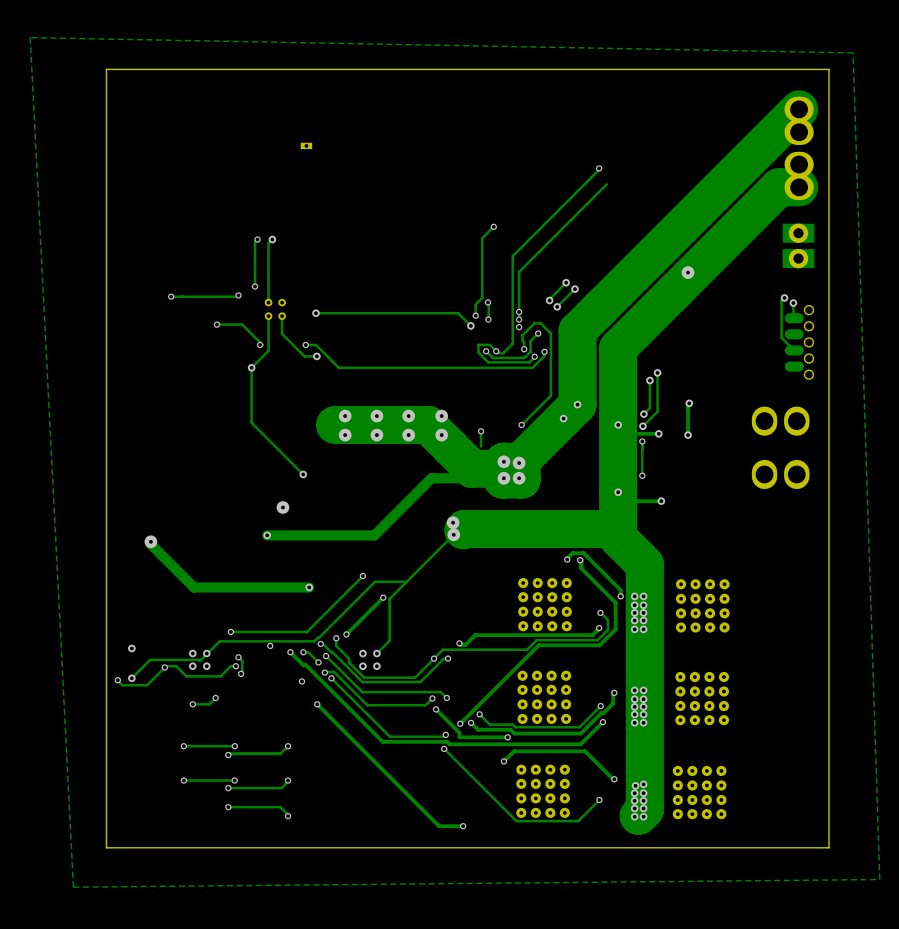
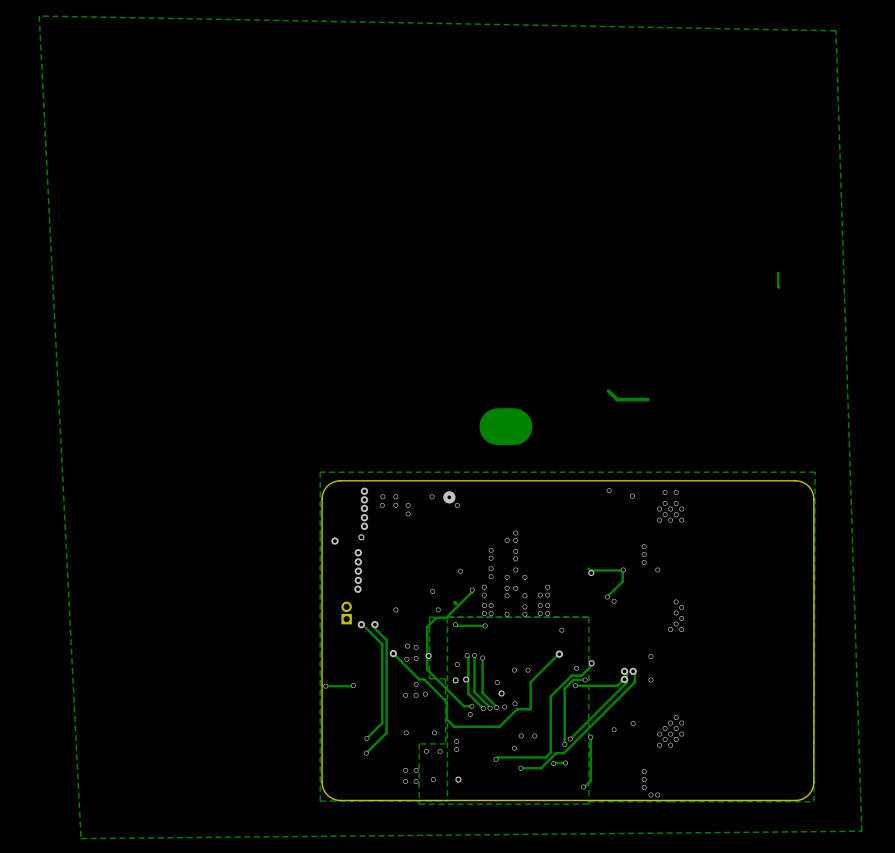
track: (799, 109) (577, 330) (577, 404) (502, 479) (521, 479) (521, 460) -> none
part: (306, 145) -> none
part: (799, 148) -> none
via: (599, 168) -> none
track: (599, 169) (512, 256) (512, 343) (503, 353) (498, 353) (489, 344) (478, 344) (478, 352) (488, 362) (529, 362) (534, 356) -> none
track: (606, 184) (519, 271) (519, 319) -> none
track: (799, 187) (779, 187) (618, 348) (618, 537) -> none
track: (493, 226) (482, 238) (482, 297) (475, 304) (475, 315) -> none
via: (493, 226) -> none
track: (257, 239) (255, 242) (255, 286) -> none
via: (257, 239) -> none
track: (272, 239) (268, 243) (268, 302) -> none
via: (272, 239) -> none
part: (798, 245) -> none
via: (688, 272) -> none
track: (566, 282) (549, 300) -> none
via: (566, 282) -> none
via: (255, 286) -> none
track: (575, 289) (557, 306) -> none
via: (575, 289) -> none
via: (238, 295) -> none
via: (171, 296) -> none
track: (238, 296) (171, 296) -> none
track: (784, 297) (781, 300) (781, 337) (794, 350) -> none
via: (784, 297) -> none
via: (549, 300) -> none
track: (488, 302) (488, 319) -> none
via: (488, 302) -> none
via: (793, 303) -> none
via: (557, 306) -> none
part: (275, 309) -> none
via: (519, 311) -> none
track: (315, 313) (458, 313) (470, 325) -> none
via: (315, 313) -> none
via: (475, 315) -> none
track: (268, 316) (268, 350) (251, 367) (251, 422) (303, 474) -> none
track: (282, 316) (282, 333) (304, 356) (316, 356) -> none
via: (488, 319) -> none
via: (519, 319) -> none
track: (216, 324) (242, 324) (260, 342) (260, 344) (262, 344) -> none
via: (216, 324) -> none
via: (470, 325) -> none
via: (519, 327) -> none
track: (538, 333) (530, 341) (530, 351) (524, 357) (492, 357) (486, 351) -> none
via: (538, 333) -> none
part: (799, 342) -> none
via: (260, 344) -> none
track: (305, 344) (315, 344) (338, 367) (532, 367) (544, 356) (544, 351) -> none
via: (305, 344) -> none
track: (524, 349) (522, 335) (534, 323) (540, 323) (550, 333) (550, 395) (521, 424) -> none
via: (524, 349) -> none
via: (486, 351) -> none
via: (496, 351) -> none
via: (544, 351) -> none
via: (316, 356) -> none
via: (534, 356) -> none
via: (251, 367) -> none
track: (657, 372) (657, 411) (642, 426) -> none
via: (657, 372) -> none
track: (649, 380) (649, 408) (643, 414) -> none
via: (649, 380) -> none
track: (689, 403) (688, 435) -> none
via: (689, 403) -> none
via: (577, 404) -> none
via: (643, 414) -> none
via: (345, 416) -> none
via: (376, 416) -> none
via: (408, 416) -> none
via: (441, 416) -> none
via: (563, 418) -> none
part: (780, 421) -> none
track: (335, 424) (428, 424) (471, 468) (496, 468) (503, 461) (503, 478) (431, 478) (374, 535) (267, 535) -> none
via: (521, 424) -> none
via: (618, 424) -> none
via: (642, 426) -> none
track: (481, 431) (481, 446) -> none
via: (481, 431) -> none
via: (658, 433) -> none
via: (345, 435) -> none
via: (376, 435) -> none
via: (408, 435) -> none
via: (441, 435) -> none
via: (688, 435) -> none
track: (642, 440) (642, 475) -> none
via: (642, 441) -> none
via: (503, 461) -> none
via: (519, 463) -> none
via: (303, 474) -> none
part: (780, 474) -> none
via: (642, 475) -> none
via: (503, 478) -> none
via: (519, 478) -> none
track: (618, 492) (627, 501) (661, 501) -> none
via: (618, 492) -> none
via: (661, 501) -> none
via: (282, 507) -> none
via: (453, 522) -> none
via: none -> (609, 490)
via: none -> (364, 491)
via: none -> (665, 492)
via: none -> (676, 492)
track: (463, 530) (609, 529) (644, 564) (644, 809) (638, 816) -> none
via: none -> (632, 496)
via: none -> (382, 496)
via: none -> (395, 496)
via: none -> (432, 496)
track: (453, 534) (389, 598) (389, 640) (376, 653) -> none
via: (267, 535) -> none
via: none -> (364, 499)
track: (150, 541) (150, 544) (194, 587) (309, 587) -> none
via: (150, 541) -> none
via: none -> (665, 503)
via: none -> (676, 503)
via: none -> (382, 505)
via: none -> (395, 505)
via: none -> (408, 505)
via: none -> (457, 505)
via: none -> (364, 508)
via: none -> (659, 509)
via: none -> (670, 509)
via: none -> (681, 509)
via: none -> (408, 514)
via: none -> (665, 514)
via: none -> (676, 514)
via: none -> (364, 517)
via: none -> (659, 520)
via: none -> (670, 520)
via: none -> (681, 520)
track: (567, 559) (572, 553) (583, 553) (620, 590) (620, 596) -> none
via: (567, 559) -> none
track: (581, 559) (581, 568) (615, 602) (615, 629) (599, 645) (538, 645) (460, 723) -> none
via: (580, 560) -> none
via: none -> (364, 526)
via: none -> (515, 533)
track: (362, 576) (307, 631) (230, 631) -> none
via: none -> (334, 541)
via: none -> (507, 540)
via: none -> (515, 540)
track: (406, 581) (375, 581) (314, 641) (219, 641) (199, 661) (150, 659) (131, 678) -> none
via: none -> (644, 546)
via: (309, 587) -> none
via: none -> (491, 550)
via: none -> (515, 551)
via: none -> (358, 552)
via: none -> (644, 554)
via: (620, 596) -> none
via: (634, 596) -> none
via: (643, 596) -> none
track: (383, 597) (346, 634) -> none
via: (383, 597) -> none
via: none -> (491, 558)
via: none -> (515, 558)
via: none -> (358, 561)
via: none -> (644, 562)
part: (544, 604) -> none
via: (634, 605) -> none
via: (643, 605) -> none
part: (702, 605) -> none
via: none -> (491, 568)
track: none -> (588, 568) (590, 570) (622, 570)
via: none -> (515, 569)
via: none -> (623, 569)
via: none -> (657, 569)
via: none -> (358, 571)
via: none -> (460, 571)
track: none -> (622, 570) (622, 581) (607, 596)
via: (634, 612) -> none
via: (643, 612) -> none
track: (601, 613) (608, 620) (608, 629) (597, 640) (536, 640) (527, 649) (442, 649) (434, 658) -> none
via: none -> (491, 576)
via: none -> (507, 577)
via: none -> (524, 577)
via: none -> (358, 580)
via: (634, 620) -> none
via: (643, 620) -> none
via: none -> (484, 587)
via: none -> (547, 587)
track: (599, 627) (592, 635) (475, 635) (465, 644) (459, 644) -> none
via: none -> (507, 588)
via: none -> (515, 588)
via: (599, 628) -> none
via: none -> (357, 589)
via: (634, 629) -> none
via: (643, 629) -> none
track: none -> (472, 590) (446, 617) (436, 617) (427, 627) (427, 669) (463, 706) (471, 706)
via: none -> (472, 590)
via: (230, 631) -> none
via: none -> (432, 591)
via: (346, 634) -> none
via: none -> (484, 595)
via: none -> (540, 595)
via: none -> (547, 595)
via: none -> (507, 595)
via: none -> (524, 595)
via: none -> (607, 596)
track: (336, 638) (336, 645) (364, 677) (415, 677) (434, 658) -> none
via: (336, 638) -> none
via: none -> (614, 601)
via: none -> (676, 601)
track: (320, 643) (332, 652) (362, 682) (420, 682) (443, 659) (448, 659) -> none
via: (320, 643) -> none
via: (459, 643) -> none
via: (270, 645) -> none
via: none -> (484, 605)
via: none -> (491, 605)
via: none -> (540, 605)
via: none -> (547, 605)
via: none -> (524, 606)
via: (131, 648) -> none
via: none -> (681, 607)
via: none -> (395, 609)
via: none -> (438, 609)
track: (290, 652) (303, 664) (305, 664) (382, 741) (447, 741) (449, 744) (580, 744) (602, 722) -> none
via: (290, 652) -> none
track: (303, 652) (308, 652) (318, 662) -> none
via: (303, 652) -> none
via: (192, 653) -> none
via: (206, 653) -> none
via: (362, 653) -> none
via: (376, 653) -> none
part: none -> (346, 612)
via: none -> (484, 613)
via: none -> (491, 613)
via: none -> (540, 613)
via: none -> (547, 613)
via: none -> (676, 612)
via: none -> (507, 614)
via: none -> (524, 614)
track: (326, 656) (362, 692) (440, 692) (446, 698) -> none
via: (326, 656) -> none
track: (238, 657) (242, 661) (241, 673) -> none
via: (238, 657) -> none
via: (434, 658) -> none
via: (448, 658) -> none
zone outline: none -> (447, 617) (447, 801) (320, 801) (320, 472) (815, 472) (813, 801) (588, 801)
zone outline: none -> (588, 617) (429, 617) (429, 678) (445, 678) (445, 743) (419, 743) (419, 804) (588, 804) (588, 617)
via: none -> (681, 618)
via: (318, 662) -> none
via: none -> (676, 624)
via: (192, 666) -> none
via: (206, 666) -> none
track: (235, 666) (230, 666) (220, 676) (186, 676) (176, 666) (166, 666) (147, 685) (122, 685) (117, 680) -> none
via: (235, 666) -> none
track: none -> (455, 624) (485, 625)
via: none -> (455, 624)
via: (164, 667) -> none
via: none -> (485, 625)
track: none -> (365, 627) (382, 644) (382, 723) (366, 738)
track: none -> (375, 628) (386, 640) (386, 732) (366, 753)
via: none -> (561, 630)
via: none -> (670, 629)
via: none -> (681, 629)
track: (324, 672) (334, 671) (367, 705) (425, 705) (432, 698) -> none
via: (324, 672) -> none
via: (241, 673) -> none
via: (131, 678) -> none
track: (331, 678) (389, 736) (443, 736) (445, 734) -> none
via: (331, 678) -> none
via: (117, 680) -> none
via: (301, 681) -> none
via: none -> (407, 646)
via: none -> (416, 647)
via: (634, 690) -> none
via: (643, 690) -> none
track: (613, 692) (613, 703) (580, 733) (514, 733) (510, 729) (477, 729) (471, 722) -> none
via: (614, 692) -> none
track: none -> (393, 653) (419, 679) (424, 679) (446, 702) (446, 719) (454, 726) (499, 726) (517, 709) (530, 709) (530, 682) (559, 654)
via: none -> (393, 653)
via: none -> (559, 654)
track: (215, 697) (209, 704) (192, 704) -> none
via: (215, 697) -> none
via: (446, 697) -> none
track: none -> (467, 655) (468, 693) (483, 708)
via: none -> (467, 655)
track: none -> (474, 655) (474, 692) (490, 708)
via: none -> (474, 655)
part: (544, 697) -> none
part: (702, 698) -> none
via: (634, 699) -> none
via: (643, 699) -> none
via: none -> (650, 656)
track: none -> (482, 657) (482, 693) (496, 707)
via: none -> (482, 657)
via: none -> (406, 659)
via: none -> (416, 658)
via: (192, 704) -> none
track: (317, 704) (439, 826) (463, 826) -> none
via: (317, 704) -> none
track: (600, 706) (579, 727) (515, 727) (512, 724) (489, 724) (479, 714) -> none
via: (634, 706) -> none
via: (643, 706) -> none
via: none -> (457, 664)
track: none -> (591, 665) (581, 675) (571, 675) (550, 696) (550, 752) (545, 757) (497, 757) (496, 759)
track: (436, 709) (459, 732) (459, 737) (507, 738) -> none
via: (436, 709) -> none
via: none -> (576, 668)
via: none -> (514, 670)
via: none -> (528, 670)
track: none -> (624, 670) (626, 671) (626, 682) (570, 739)
track: none -> (634, 670) (634, 682) (563, 753) (556, 753) (541, 768) (520, 768)
via: (479, 714) -> none
via: (602, 722) -> none
via: (643, 722) -> none
track: none -> (585, 679) (573, 679) (564, 688) (564, 744)
via: none -> (585, 679)
track: none -> (621, 679) (617, 685) (575, 685)
via: none -> (650, 679)
via: none -> (497, 682)
via: none -> (416, 684)
via: none -> (325, 686)
track: none -> (353, 685) (325, 686)
via: none -> (353, 685)
via: none -> (575, 685)
via: (445, 734) -> none
via: none -> (425, 694)
via: none -> (405, 695)
via: none -> (416, 695)
via: (183, 746) -> none
track: (234, 746) (183, 746) -> none
via: (234, 746) -> none
track: (288, 746) (280, 753) (229, 753) -> none
via: (288, 746) -> none
via: none -> (515, 703)
track: (444, 748) (516, 821) (578, 821) (599, 799) -> none
via: (444, 748) -> none
via: none -> (471, 706)
via: none -> (496, 707)
via: none -> (504, 707)
via: none -> (483, 708)
via: none -> (490, 708)
via: (228, 755) -> none
via: none -> (470, 714)
track: (503, 761) (514, 751) (585, 751) (613, 779) -> none
via: (503, 761) -> none
via: none -> (676, 717)
via: none -> (670, 723)
via: none -> (681, 723)
via: none -> (633, 723)
via: none -> (665, 728)
via: none -> (676, 728)
via: none -> (614, 729)
via: none -> (406, 732)
via: none -> (434, 732)
via: (614, 779) -> none
via: none -> (659, 734)
via: none -> (670, 734)
via: none -> (681, 734)
via: (183, 780) -> none
track: (234, 780) (183, 780) -> none
via: (234, 780) -> none
track: (288, 780) (281, 788) (228, 788) -> none
via: (288, 780) -> none
via: none -> (521, 735)
via: none -> (534, 735)
track: none -> (590, 737) (590, 780) (583, 786)
via: none -> (590, 737)
via: none -> (366, 738)
via: none -> (570, 739)
via: (643, 784) -> none
via: none -> (665, 739)
via: none -> (676, 739)
via: (635, 785) -> none
via: none -> (456, 741)
via: (228, 788) -> none
via: none -> (564, 744)
via: none -> (659, 745)
via: none -> (670, 745)
part: (543, 791) -> none
part: (699, 792) -> none
via: none -> (514, 748)
via: (634, 793) -> none
via: (643, 793) -> none
via: none -> (456, 749)
via: none -> (426, 751)
via: none -> (440, 751)
via: none -> (366, 753)
via: (599, 799) -> none
via: (634, 800) -> none
via: (643, 800) -> none
via: none -> (496, 759)
track: (228, 807) (280, 807) (288, 816) -> none
via: (228, 807) -> none
via: (634, 808) -> none
via: (643, 808) -> none
via: none -> (553, 763)
track: none -> (565, 762) (553, 763)
via: none -> (565, 762)
via: none -> (520, 768)
via: (288, 816) -> none
via: none -> (405, 770)
via: none -> (416, 770)
via: (634, 816) -> none
via: (643, 816) -> none
via: none -> (644, 771)
via: none -> (433, 779)
via: none -> (644, 779)
via: none -> (405, 781)
via: none -> (416, 781)
via: none -> (583, 786)
via: none -> (644, 787)
via: none -> (650, 794)
via: none -> (657, 794)
board edge: (811, 847) (828, 847) (828, 69) (106, 69) (106, 847) (341, 847) -> (795, 800) (808, 795) (813, 782) (813, 499) (808, 486) (795, 480) (340, 480) (329, 484) (324, 490) (322, 499) (322, 782) (327, 795) (340, 800)

